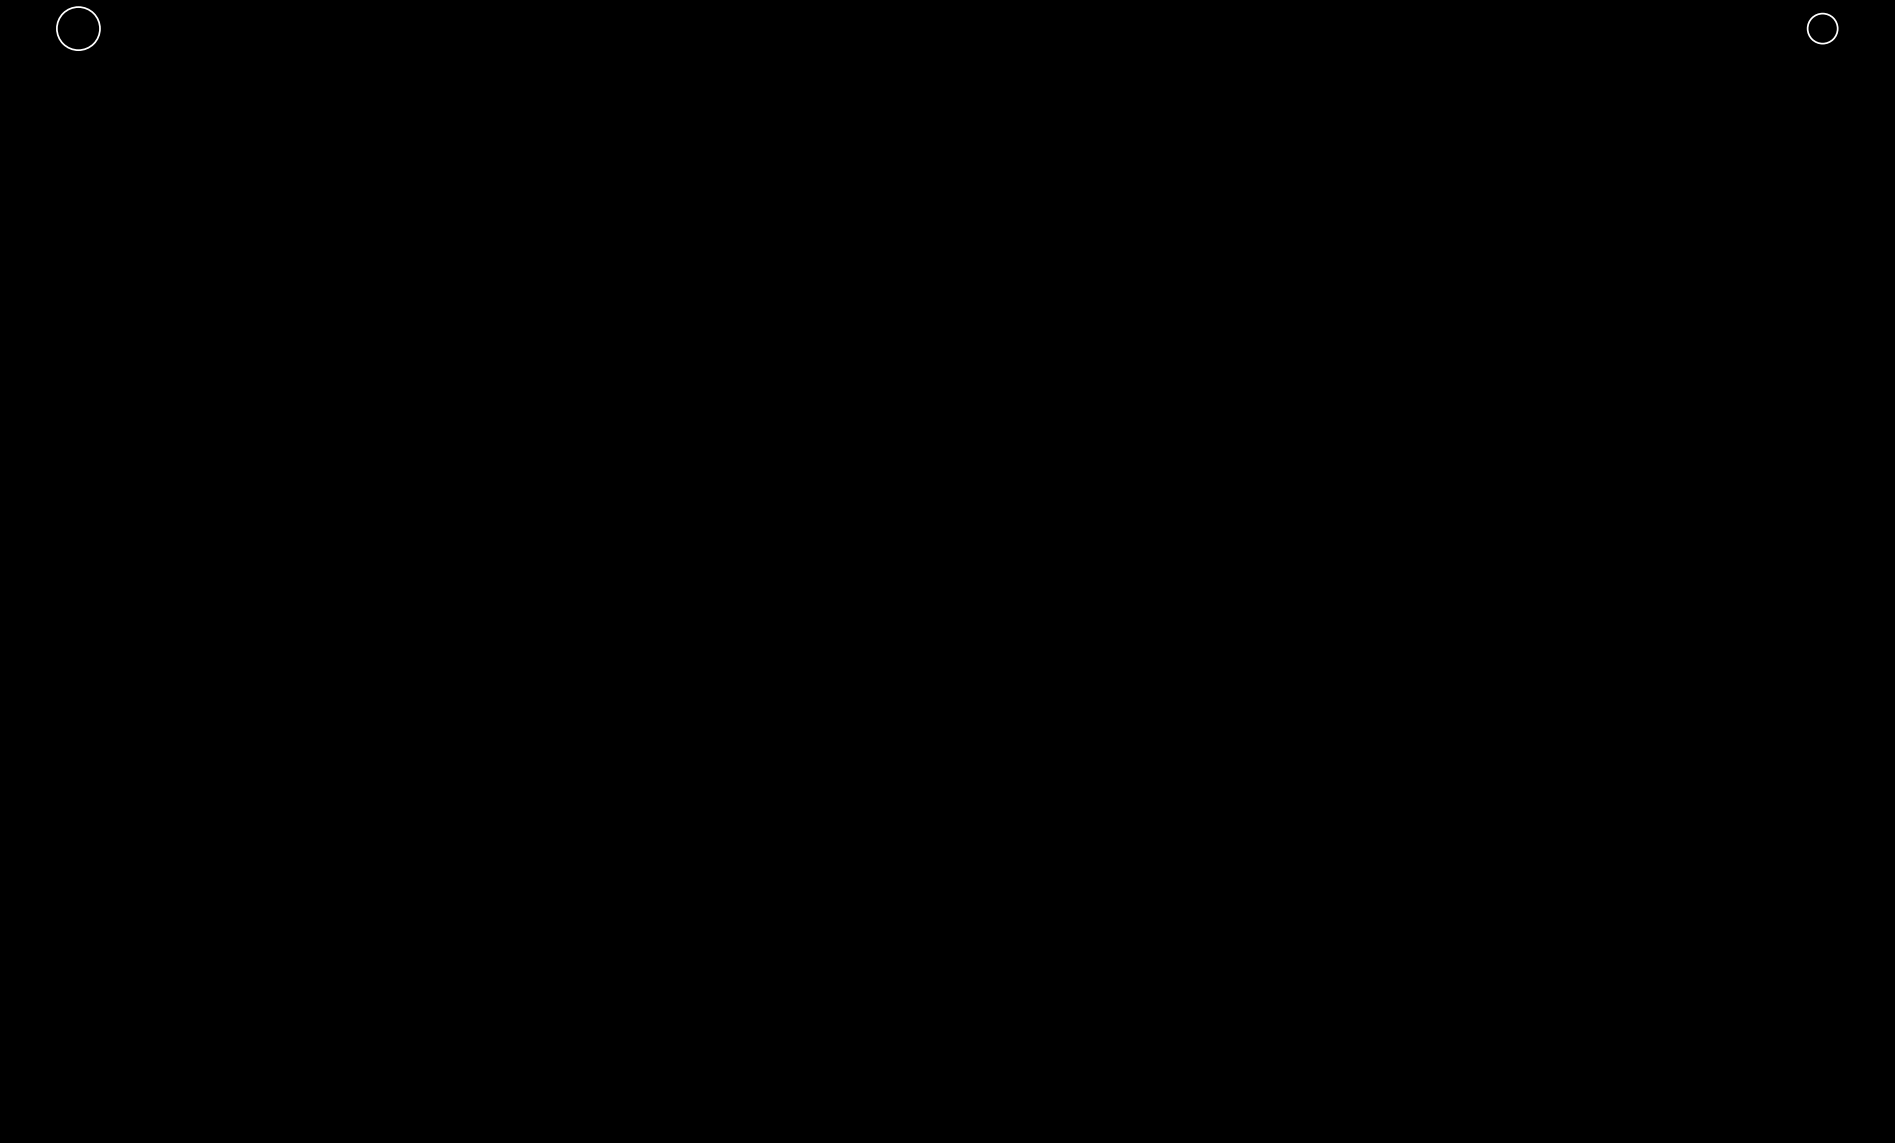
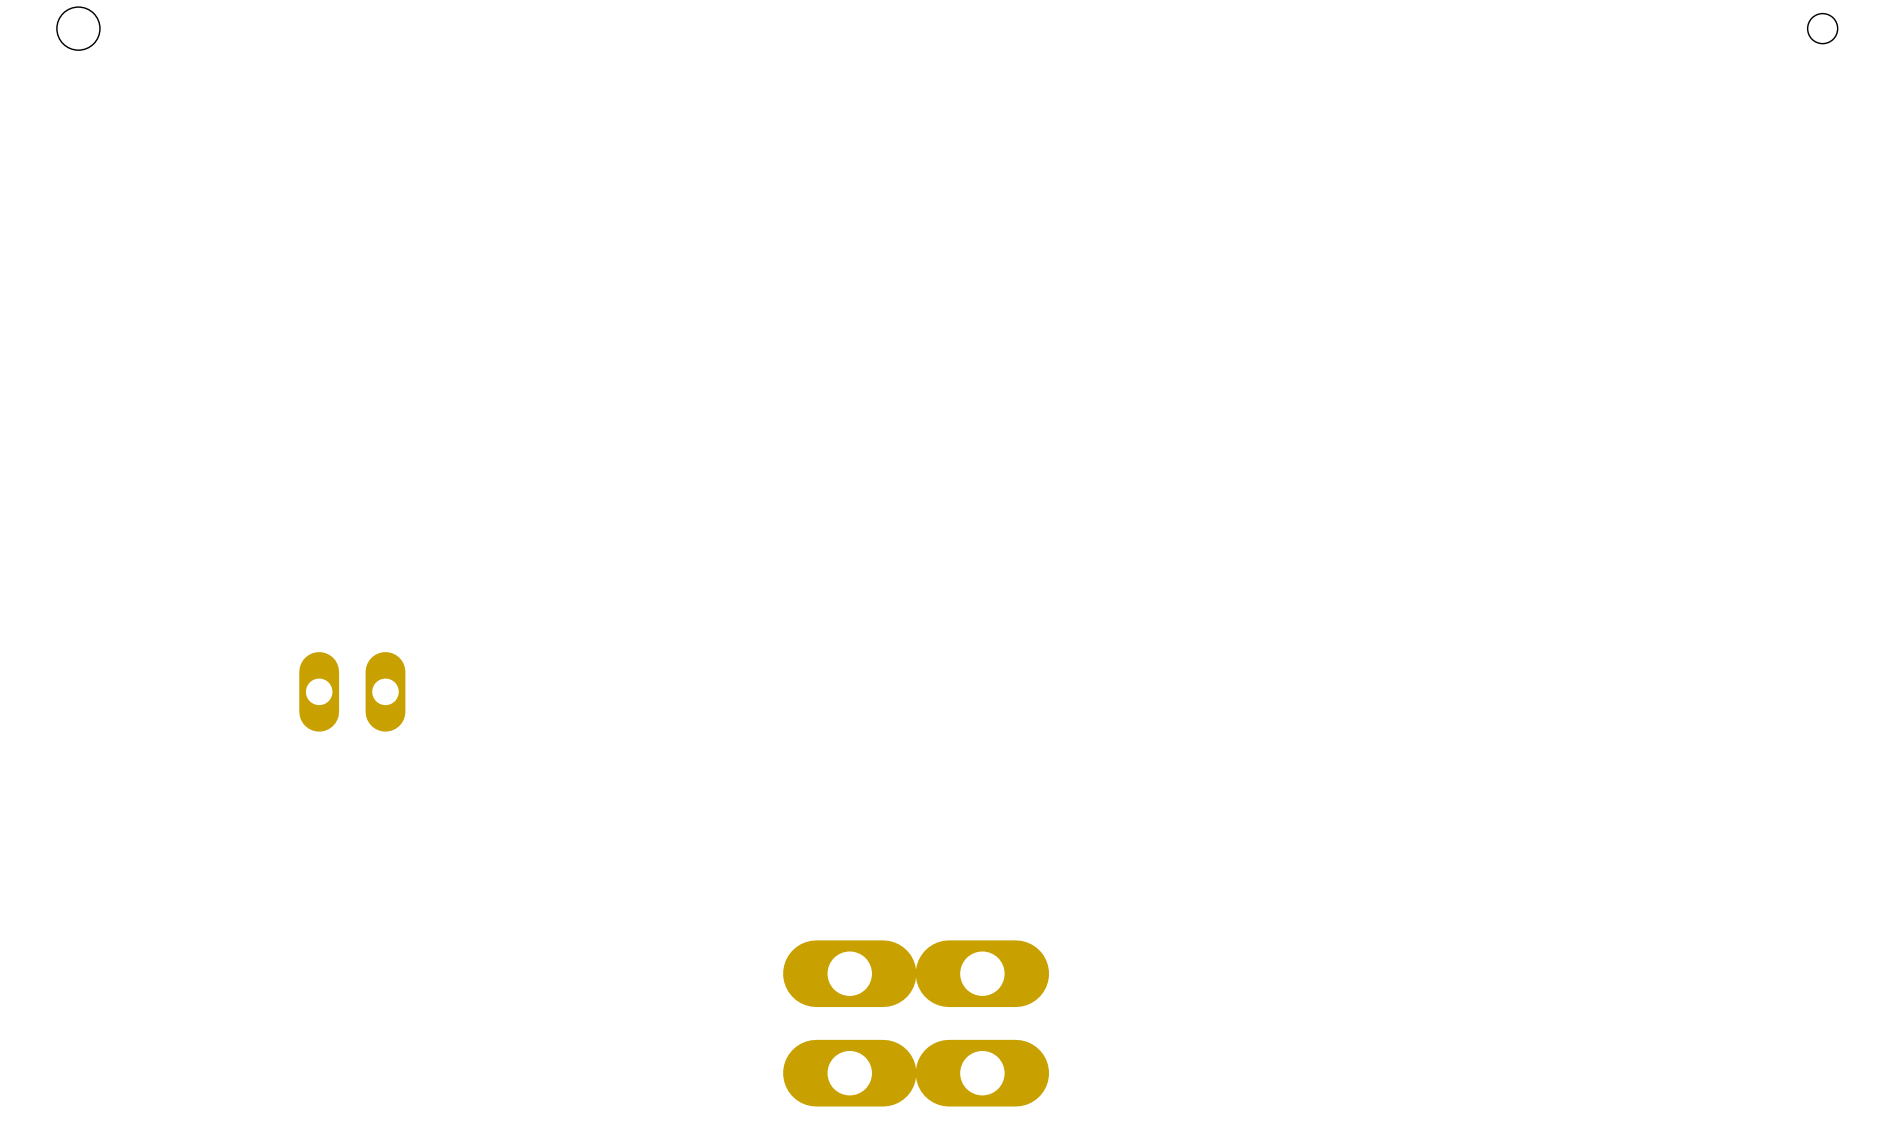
part: none -> (352, 691)
part: none -> (849, 1023)
part: none -> (982, 1023)

